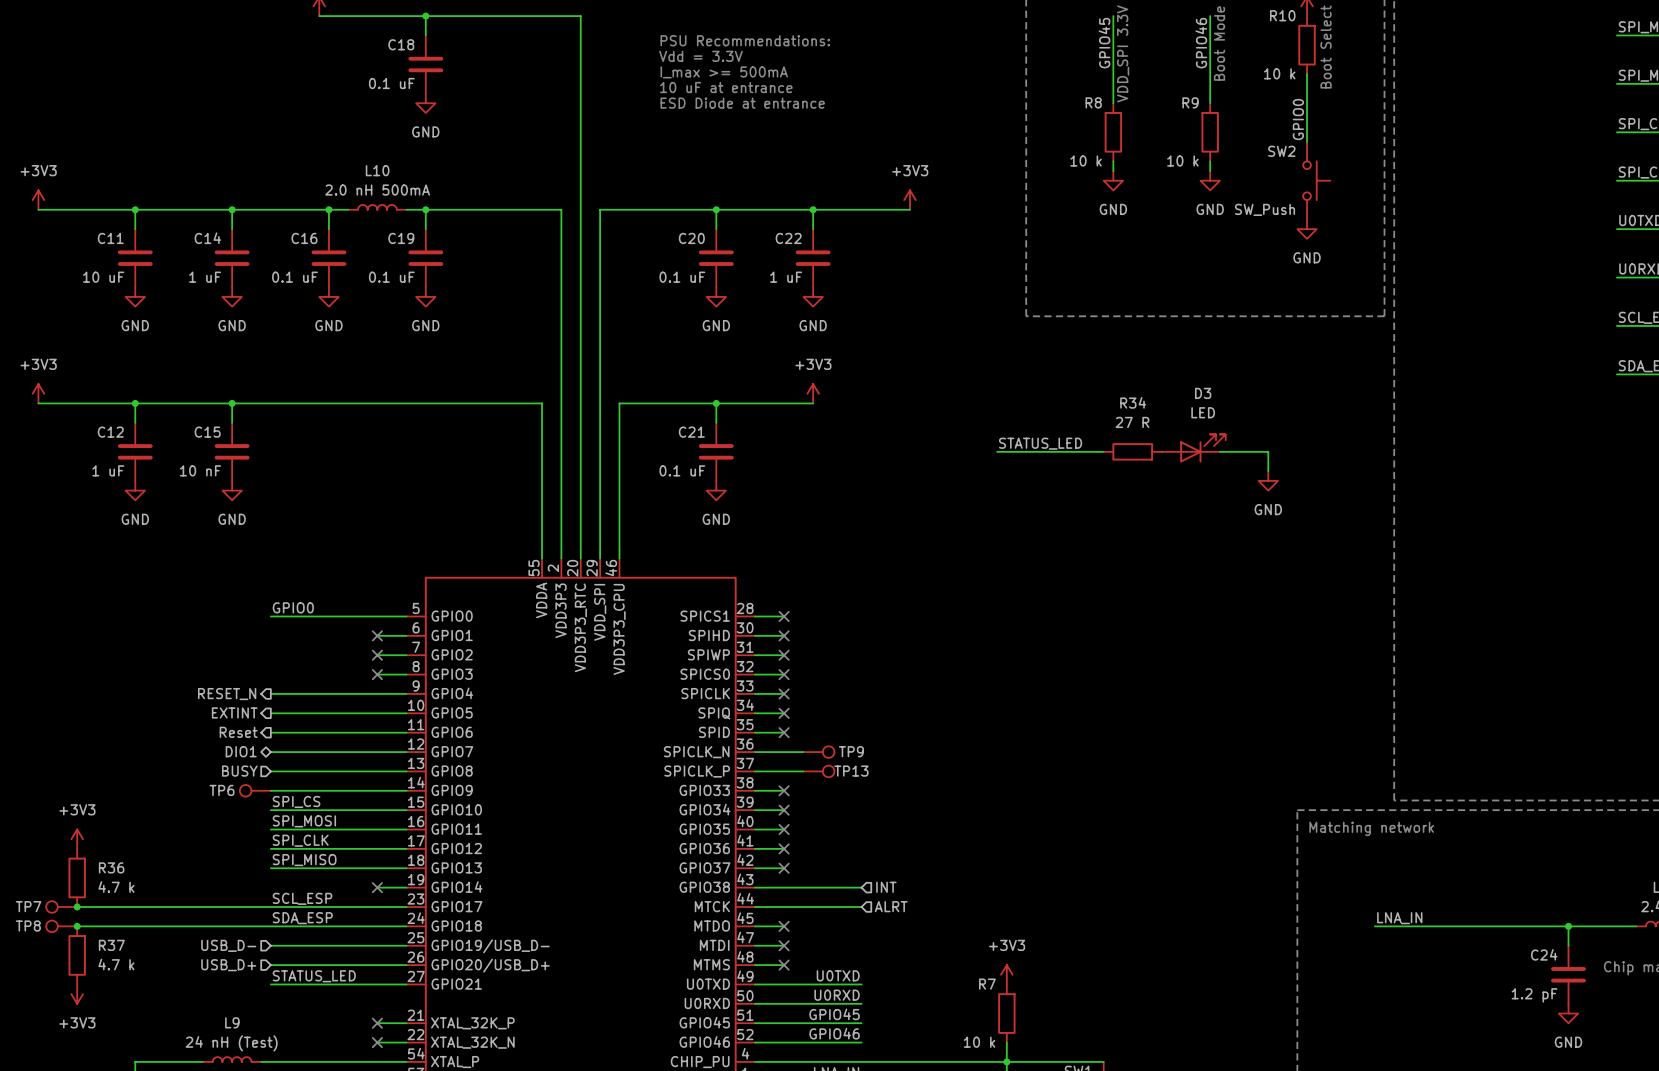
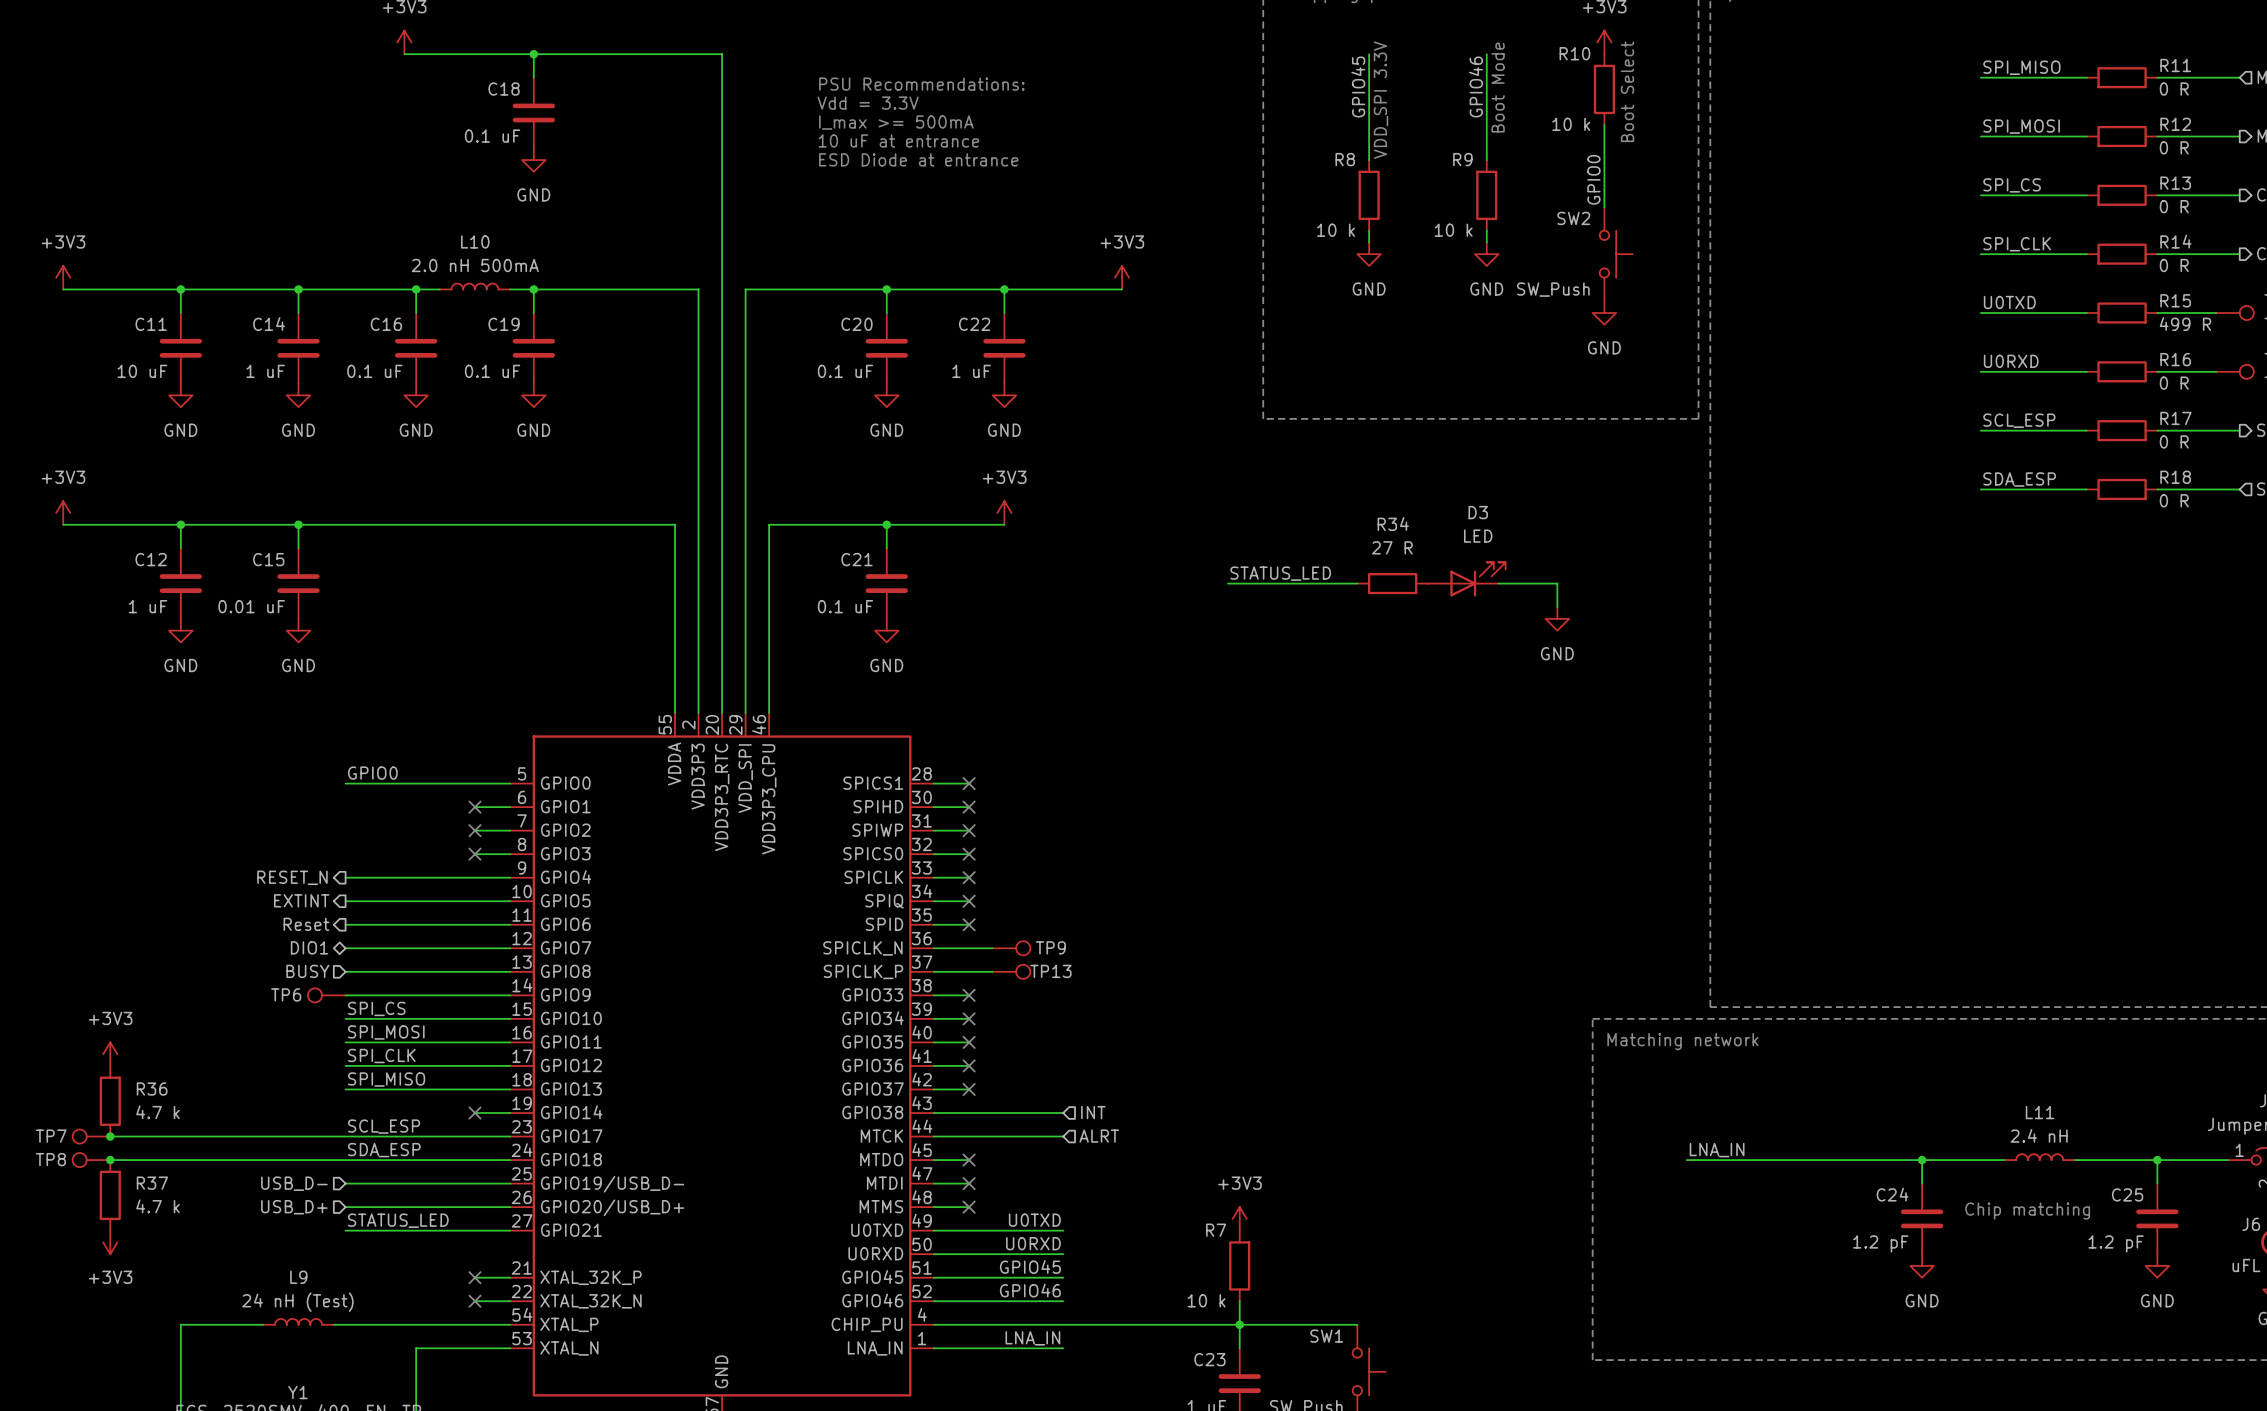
C15 value: 10 nF (200, 470) -> 0.01 uF (251, 606)

